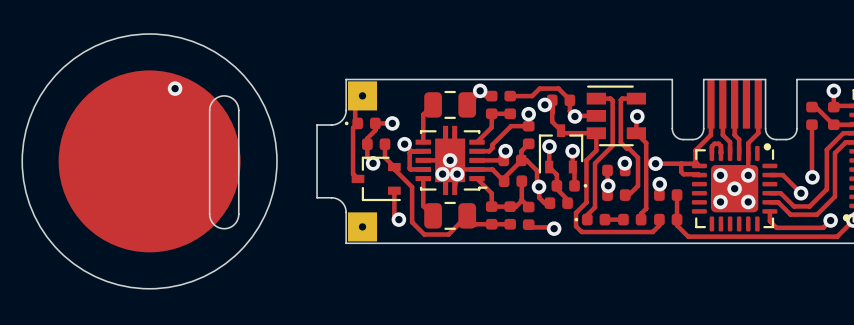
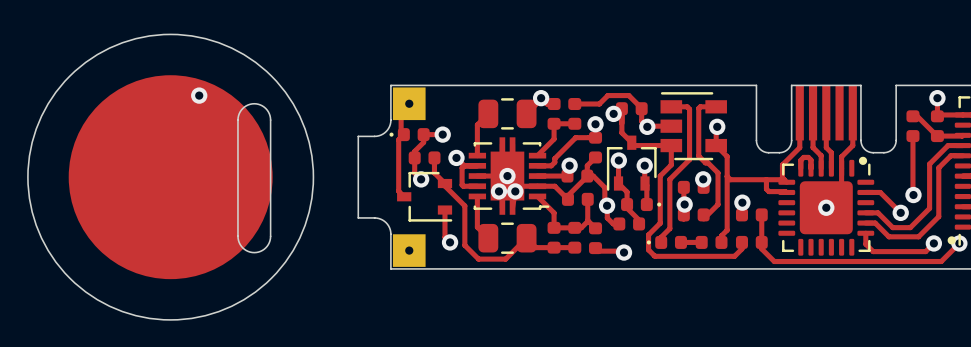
via: (655, 163) -> none
via: (720, 175) -> none
via: (748, 175) -> none
via: (720, 201) -> none
via: (748, 201) -> none

